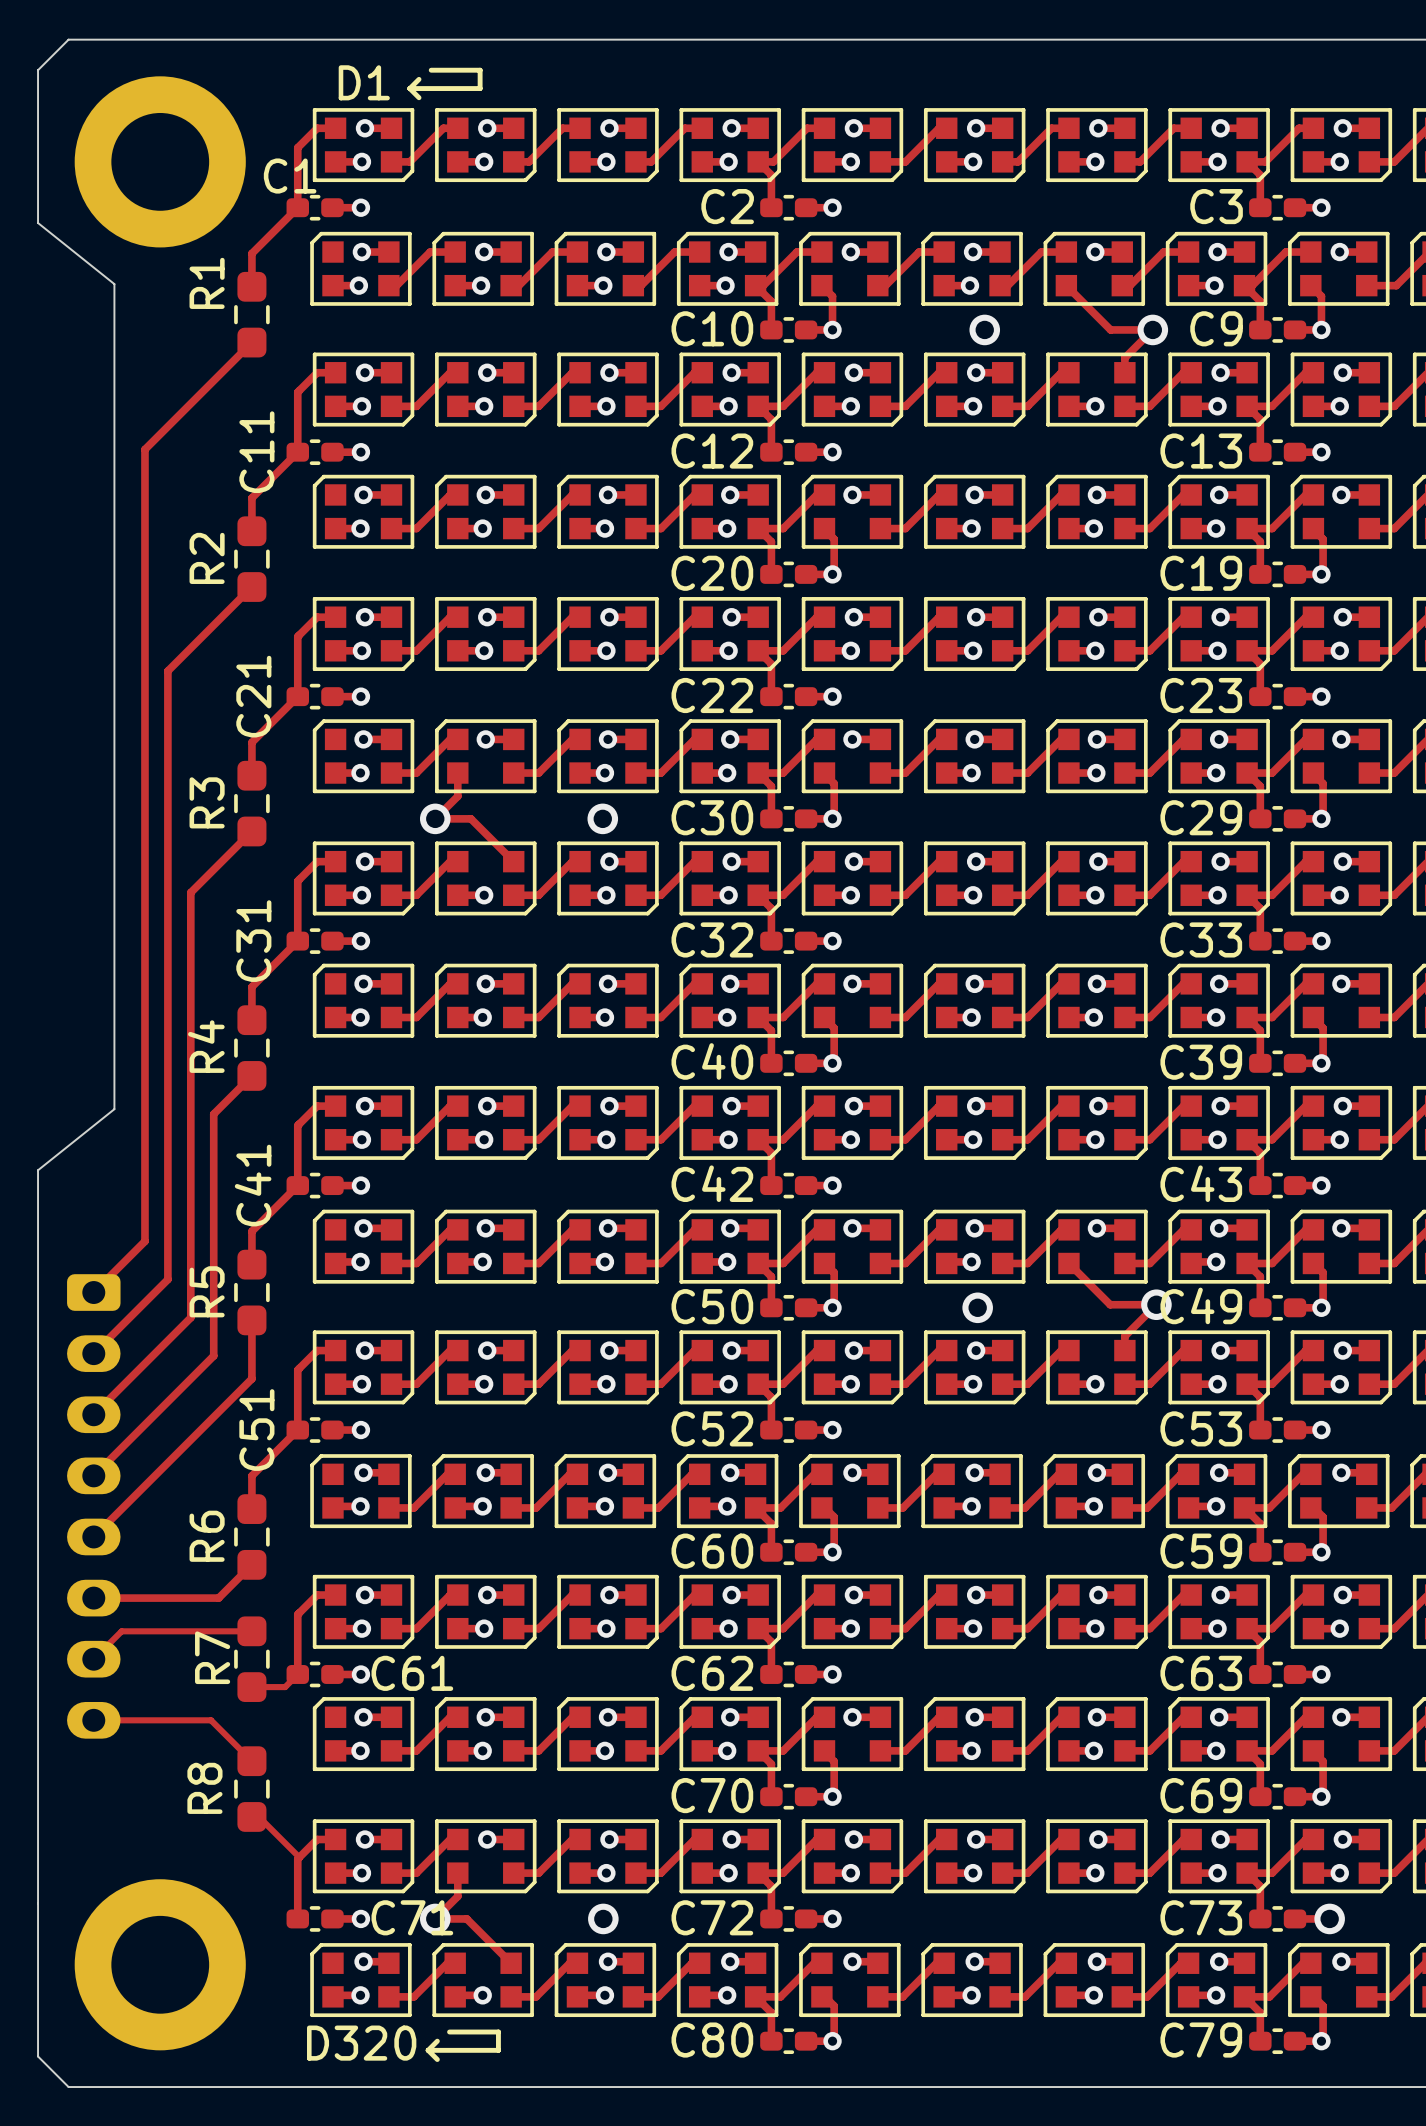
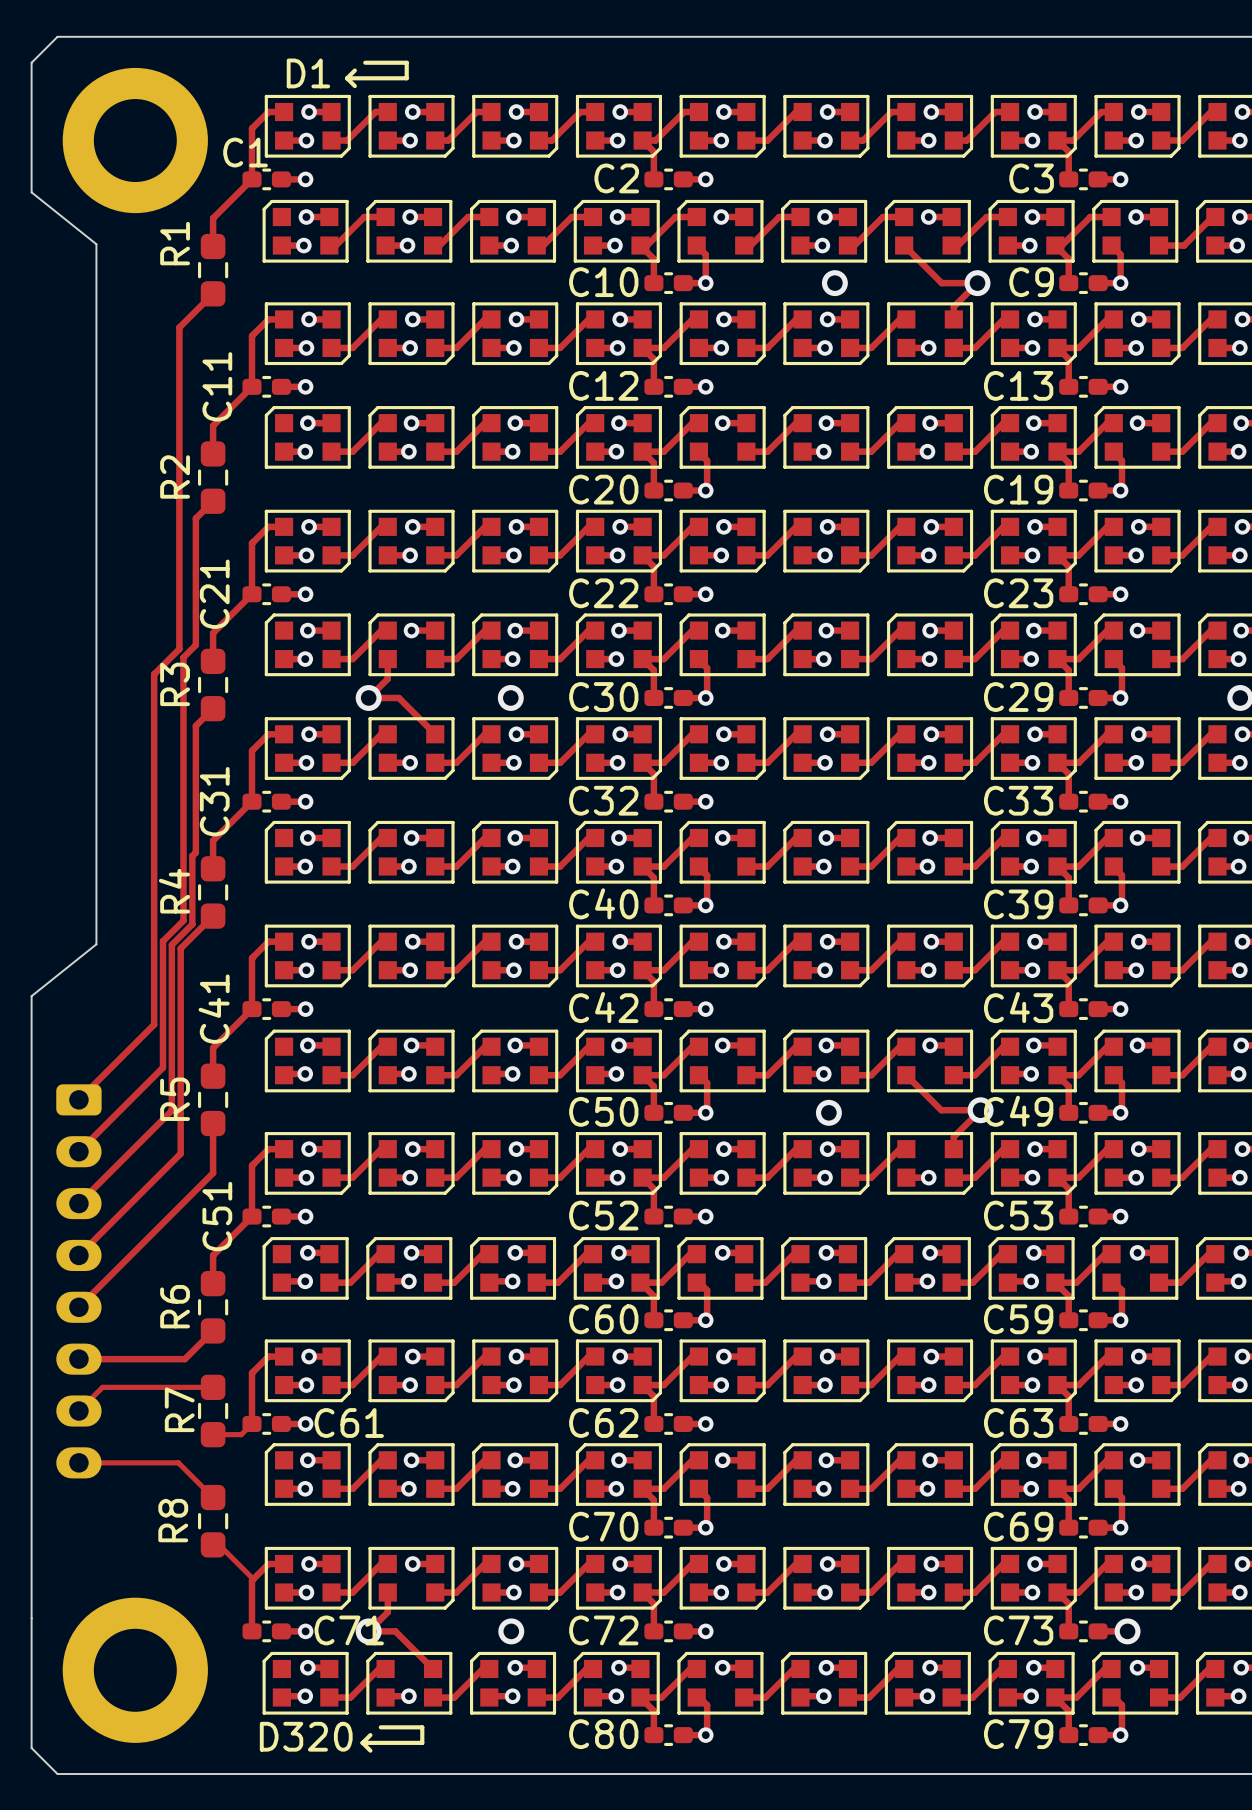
track: (212, 382) (144, 449) (144, 1241) -> (179, 327) (179, 649) (154, 674) (154, 1024) (122, 1056)
track: (231, 607) (167, 671) (167, 1279) -> (195, 518) (195, 645) (183, 657) (183, 920) (163, 941) (163, 1067) (141, 1088)
track: (231, 851) (190, 892) (190, 1317) -> (195, 725) (195, 852) (192, 856) (192, 924) (171, 944) (171, 1110) (161, 1121)

